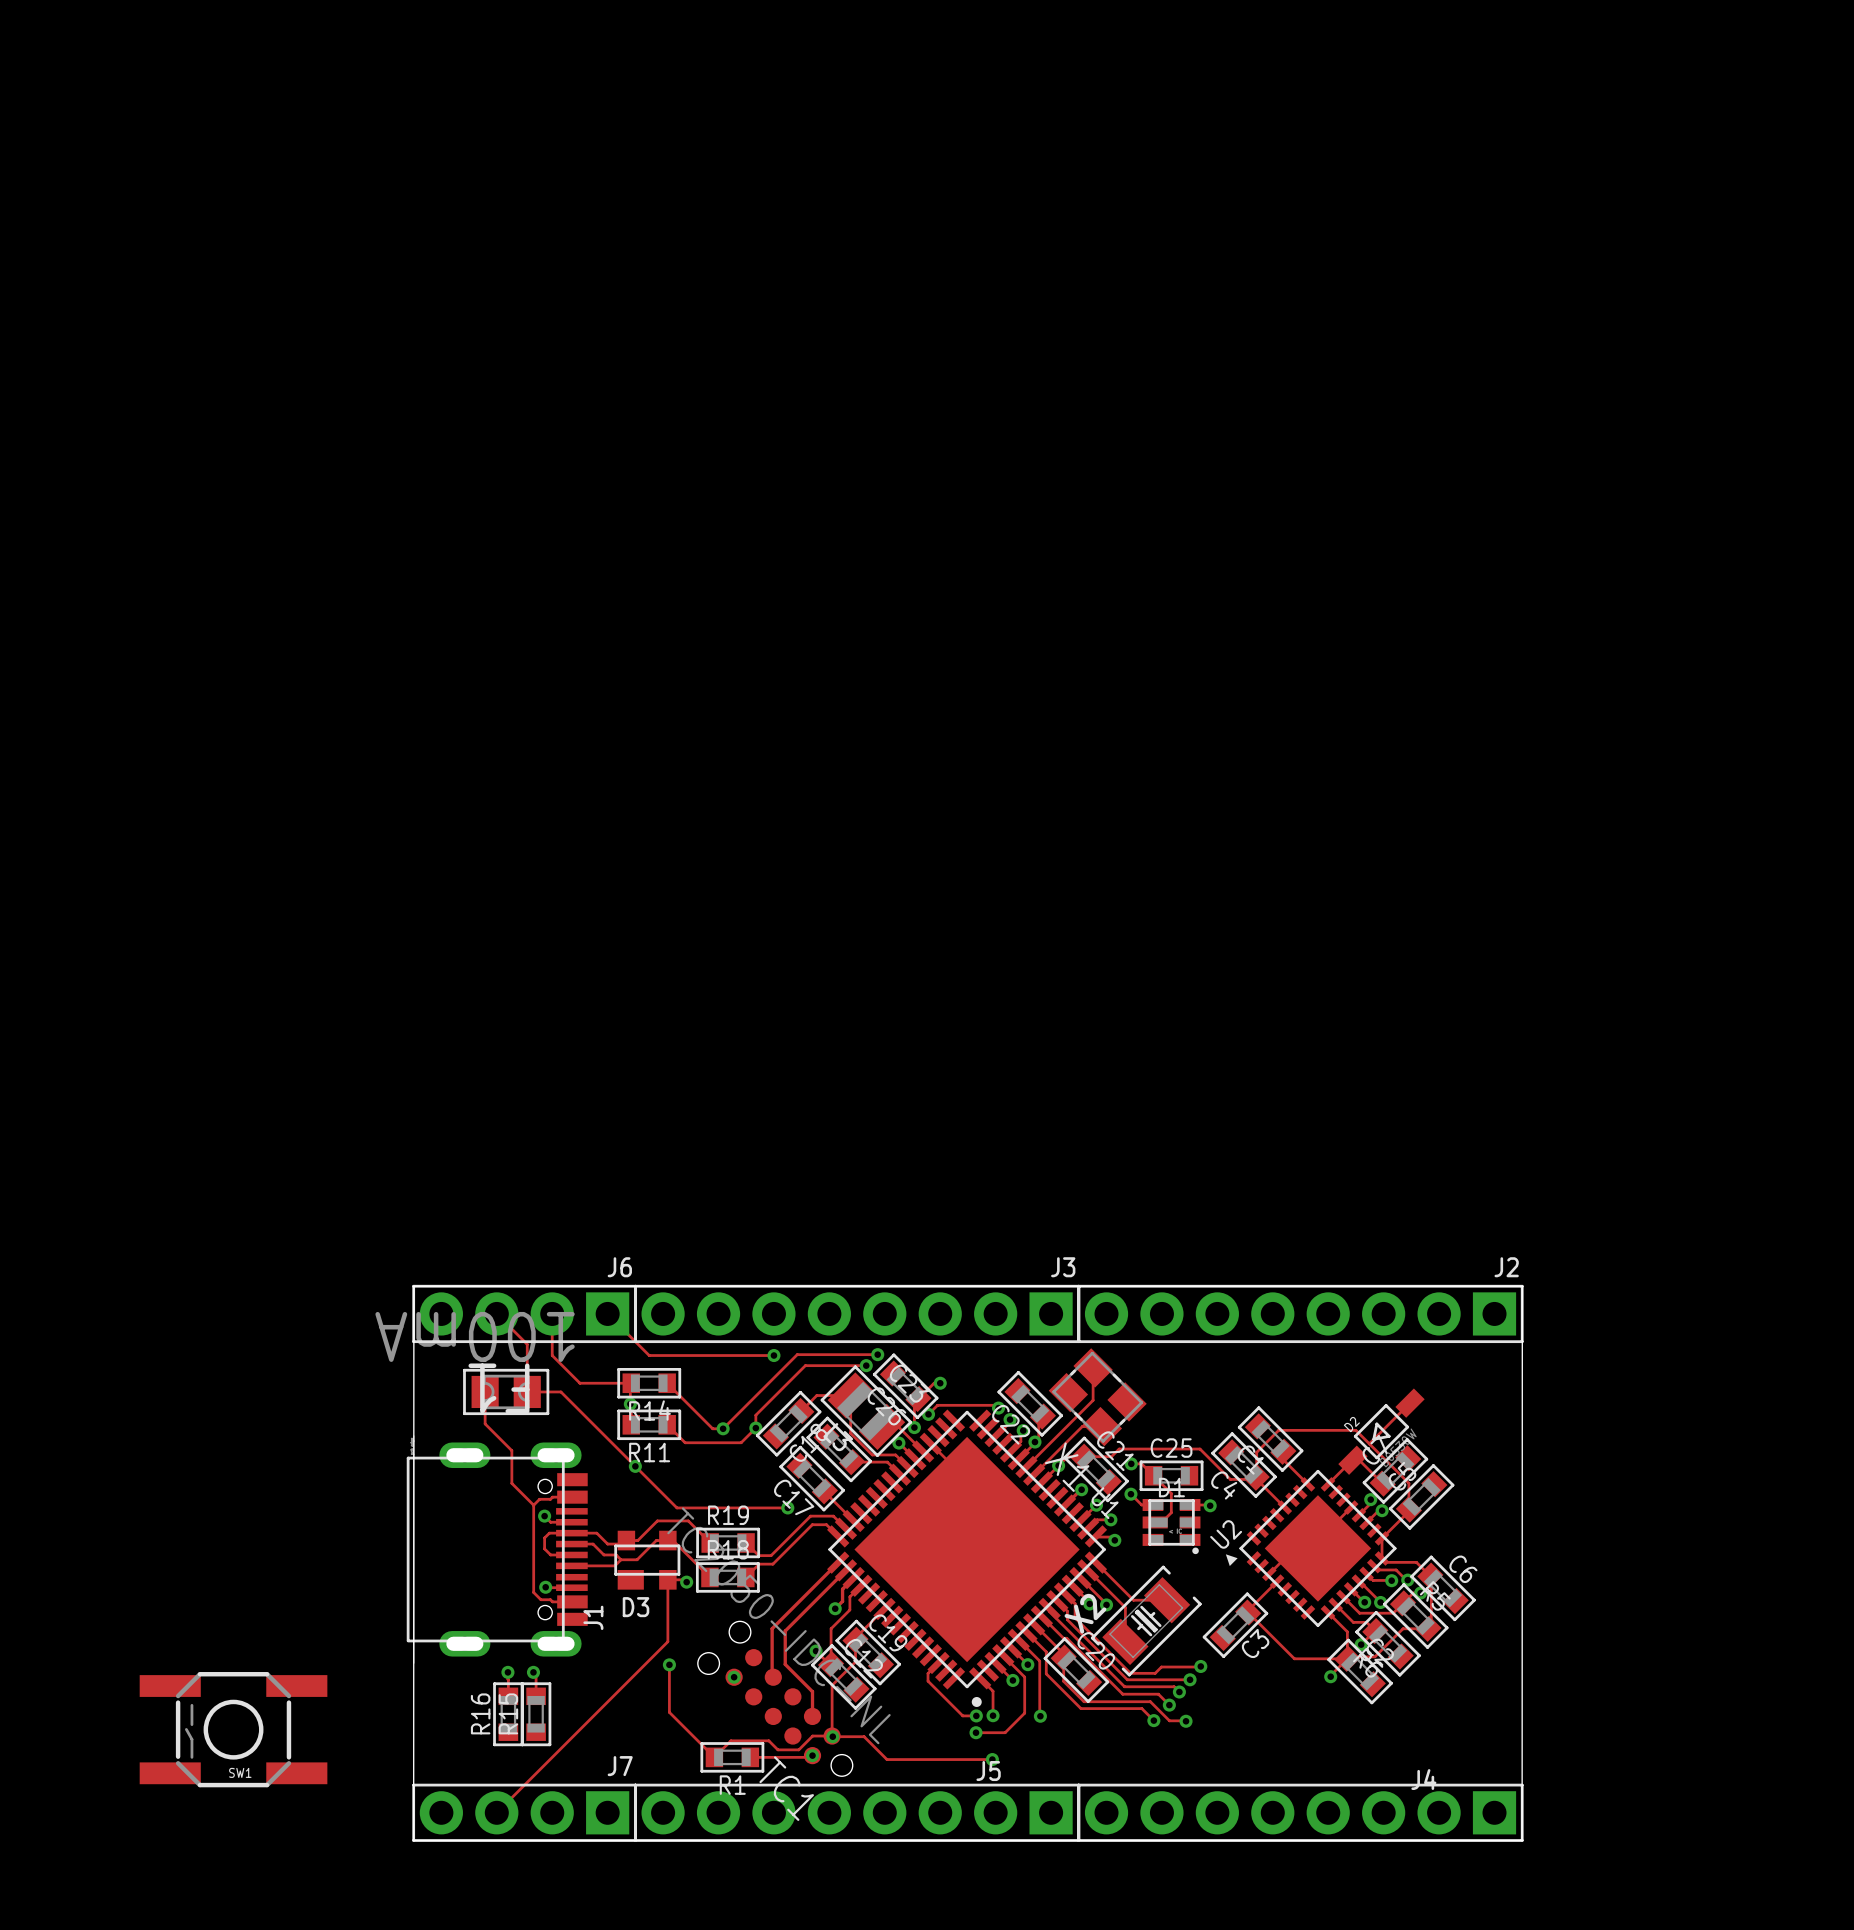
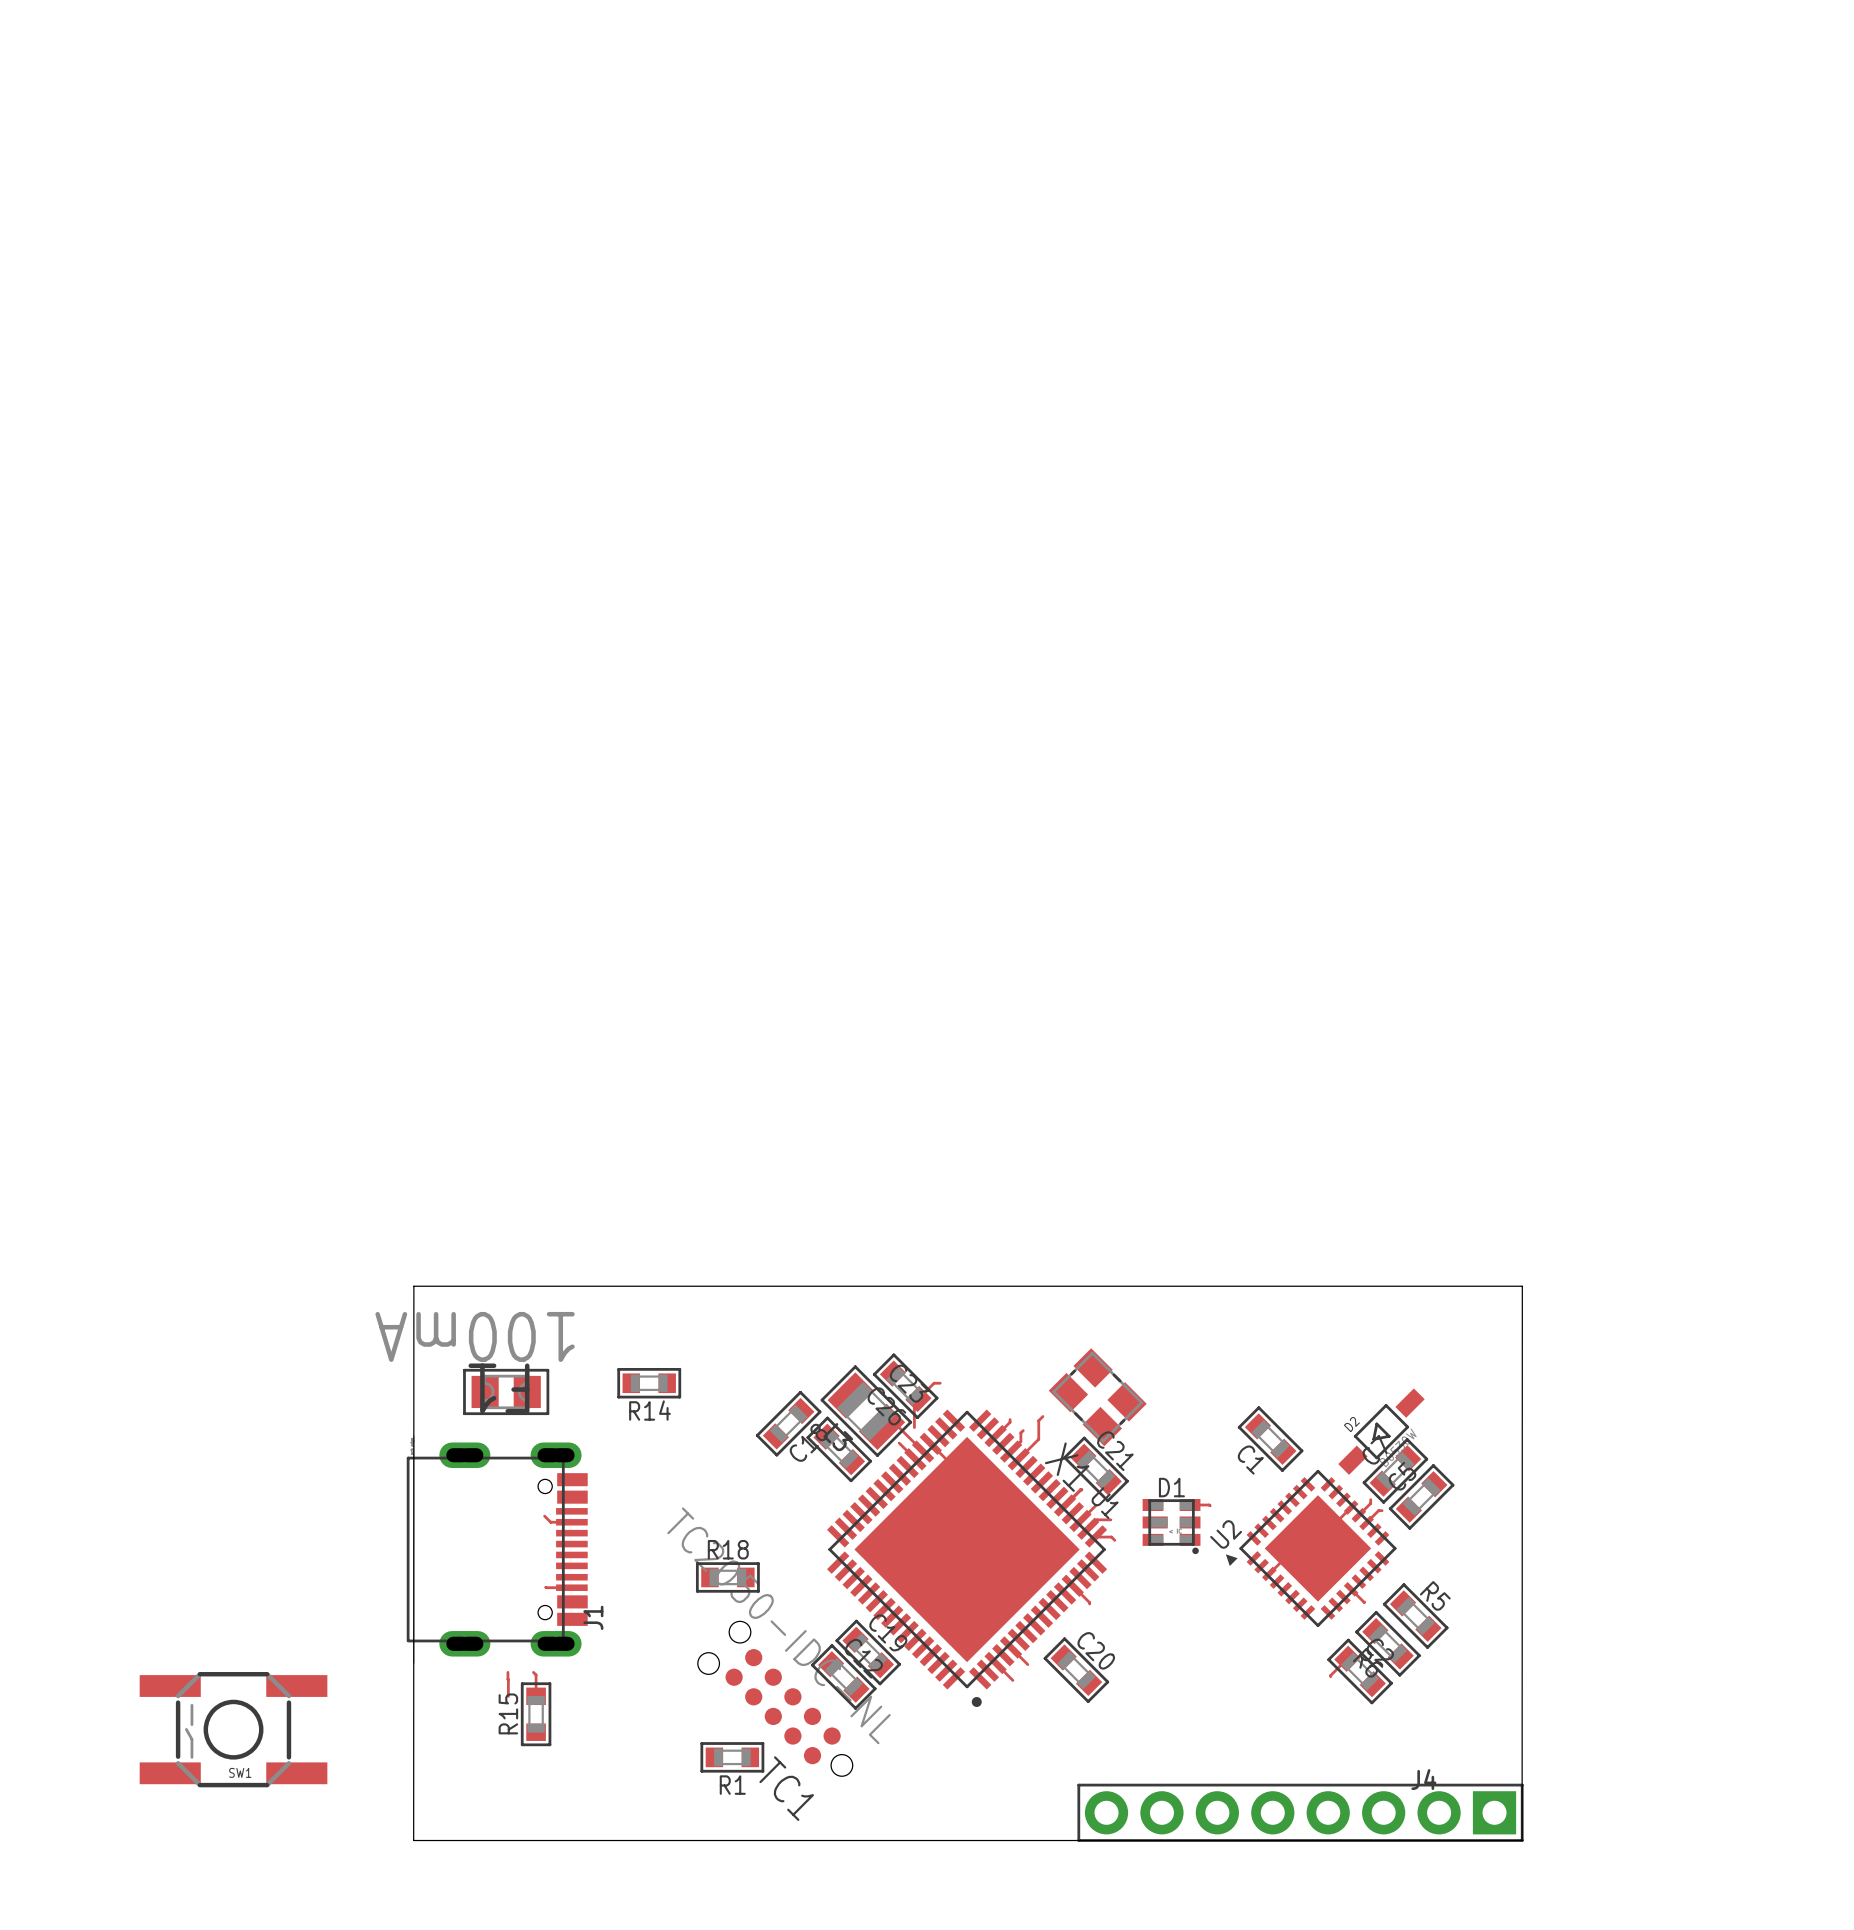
track: (496, 1313) (527, 1344) (527, 1391) (560, 1391) (676, 1507) (787, 1507) -> none
J6: (524, 1313) -> none
track: (552, 1313) (552, 1355) (579, 1383) (631, 1383) (631, 1424) -> none
track: (607, 1313) (649, 1355) (773, 1355) -> none
J3: (857, 1313) -> none
J2: (1300, 1313) -> none
track: (877, 1354) (797, 1354) (723, 1428) (712, 1428) (667, 1383) -> none
via: (877, 1354) -> none
via: (773, 1355) -> none
track: (866, 1365) (805, 1365) (755, 1415) (755, 1428) (741, 1442) (685, 1442) (667, 1424) -> none
via: (866, 1365) -> none
track: (1093, 1367) (1093, 1400) (1026, 1466) -> none
via: (940, 1383) -> none
track: (485, 1391) (485, 1423) (511, 1450) (511, 1483) (533, 1505) -> none
C22: (1030, 1403) -> none
track: (1410, 1403) (1369, 1443) -> none
via: (630, 1404) -> none
track: (998, 1408) (995, 1405) (937, 1405) (928, 1414) -> none
via: (998, 1408) -> none
track: (801, 1411) (816, 1395) (850, 1395) (850, 1433) (872, 1454) (895, 1454) (907, 1466) -> none
via: (928, 1414) -> none
via: (1010, 1419) -> none
R11: (649, 1424) -> none
track: (1102, 1426) (1082, 1426) (1034, 1474) -> none
via: (914, 1427) -> none
via: (723, 1428) -> none
via: (755, 1428) -> none
via: (1023, 1430) -> none
via: (1034, 1442) -> none
via: (898, 1443) -> none
track: (1283, 1451) (1283, 1459) (1307, 1484) -> none
track: (851, 1462) (887, 1462) (899, 1474) -> none
track: (1131, 1463) (1141, 1463) (1171, 1493) (1171, 1512) (1161, 1522) (1155, 1522) -> none
via: (1131, 1463) -> none
via: (1058, 1465) -> none
C4: (1243, 1465) -> none
via: (635, 1466) -> none
C25: (1171, 1475) -> none
C17: (812, 1478) -> none
track: (1256, 1479) (1284, 1507) -> none
track: (1256, 1479) (1256, 1452) (1278, 1430) (1355, 1430) (1408, 1483) (1408, 1511) (1382, 1538) (1382, 1558) (1385, 1562) (1416, 1562) (1430, 1575) (1431, 1625) (1428, 1628) (1403, 1628) (1374, 1656) (1347, 1656) -> none
track: (1256, 1479) (1230, 1479) (1200, 1449) (1119, 1449) (1111, 1456) (1067, 1456) (1041, 1482) -> none
track: (1382, 1483) (1359, 1460) (1352, 1460) (1328, 1484) -> none
via: (1081, 1489) -> none
track: (824, 1491) (853, 1520) -> none
track: (1130, 1494) (1141, 1505) (1152, 1505) -> none
via: (1130, 1494) -> none
track: (572, 1497) (539, 1499) (533, 1505) -> none
via: (1370, 1499) -> none
track: (533, 1505) (533, 1592) (540, 1599) (572, 1601) -> none
via: (1096, 1505) -> none
via: (1210, 1505) -> none
via: (787, 1507) -> none
via: (1382, 1510) -> none
via: (544, 1516) -> none
via: (1110, 1519) -> none
track: (845, 1528) (833, 1516) (810, 1516) (771, 1555) (758, 1555) (746, 1542) -> none
track: (838, 1536) (826, 1524) (812, 1524) (772, 1564) (759, 1564) (745, 1577) -> none
via: (1114, 1540) -> none
track: (710, 1542) (688, 1520) (657, 1520) (637, 1540) (626, 1540) (629, 1544) (607, 1544) (596, 1533) (549, 1533) (544, 1537) (544, 1548) (550, 1554) (571, 1554) -> none
R19: (728, 1542) -> none
track: (571, 1544) (593, 1544) (603, 1554) (616, 1554) (620, 1559) -> none
track: (620, 1559) (637, 1559) (656, 1540) (673, 1540) (709, 1577) -> none
track: (620, 1559) (614, 1565) (571, 1565) -> none
D3: (647, 1560) -> none
track: (838, 1562) (772, 1628) (773, 1677) -> none
track: (1095, 1562) (1133, 1600) (1167, 1600) -> none
track: (1374, 1566) (1378, 1569) (1396, 1569) (1407, 1580) -> none
track: (845, 1570) (785, 1631) (785, 1664) (812, 1691) (812, 1716) -> none
track: (1088, 1570) (1125, 1607) (1125, 1641) -> none
track: (1366, 1573) (1373, 1580) (1391, 1580) -> none
track: (853, 1578) (842, 1589) (842, 1601) (835, 1608) -> none
track: (1080, 1578) (1106, 1604) -> none
via: (1391, 1580) -> none
via: (1407, 1580) -> none
track: (1277, 1581) (1248, 1612) (1294, 1658) (1347, 1658) (1347, 1631) (1328, 1612) -> none
track: (1358, 1581) (1380, 1602) -> none
track: (686, 1582) (684, 1579) (667, 1579) (667, 1641) (496, 1812) -> none
via: (686, 1582) -> none
track: (860, 1585) (849, 1596) (849, 1609) (831, 1628) (831, 1664) (816, 1651) -> none
via: (545, 1587) -> none
C6: (1443, 1588) -> none
track: (1065, 1593) (1075, 1603) (1075, 1617) (1130, 1673) (1155, 1673) (1161, 1667) (1200, 1666) -> none
track: (1420, 1593) (1413, 1593) (1393, 1613) (1359, 1613) (1343, 1597) -> none
via: (1420, 1593) -> none
track: (1057, 1601) (1067, 1611) (1067, 1619) (1127, 1679) (1190, 1679) -> none
via: (1364, 1602) -> none
via: (1380, 1602) -> none
via: (1089, 1603) -> none
via: (1106, 1604) -> none
track: (1335, 1604) (1353, 1622) (1366, 1622) (1375, 1631) (1361, 1644) -> none
via: (835, 1608) -> none
track: (884, 1608) (855, 1637) (855, 1661) (832, 1685) (832, 1736) (812, 1736) (798, 1749) (777, 1749) (768, 1740) (730, 1740) (714, 1757) (669, 1712) (669, 1664) -> none
track: (1049, 1608) (1049, 1611) (1124, 1686) (1174, 1686) (1179, 1692) -> none
track: (1041, 1616) (1063, 1638) (1066, 1638) (1122, 1694) (1158, 1694) (1169, 1705) -> none
X2: (1146, 1621) -> none
track: (1034, 1624) (1063, 1653) (1063, 1681) (1084, 1701) (1150, 1701) (1169, 1720) (1186, 1721) -> none
C3: (1235, 1625) -> none
track: (1026, 1632) (1046, 1651) (1046, 1673) (1080, 1708) (1141, 1708) (1153, 1720) -> none
track: (1018, 1640) (1039, 1661) (1040, 1716) -> none
via: (1361, 1644) -> none
via: (816, 1651) -> none
track: (1003, 1655) (1024, 1677) (1024, 1713) (1005, 1732) (976, 1732) -> none
track: (938, 1662) (928, 1673) (928, 1681) (962, 1715) (976, 1715) -> none
via: (669, 1664) -> none
via: (1027, 1664) -> none
via: (1200, 1666) -> none
via: (507, 1672) -> none
via: (533, 1672) -> none
via: (1330, 1676) -> none
via: (734, 1677) -> none
track: (980, 1678) (993, 1691) (993, 1715) -> none
via: (1190, 1679) -> none
via: (1012, 1680) -> none
via: (1179, 1692) -> none
via: (1169, 1705) -> none
R16: (508, 1714) -> none
via: (976, 1715) -> none
via: (993, 1715) -> none
via: (1040, 1716) -> none
via: (1153, 1720) -> none
via: (1186, 1721) -> none
via: (976, 1732) -> none
track: (832, 1736) (864, 1736) (886, 1759) (992, 1759) -> none
via: (832, 1736) -> none
track: (812, 1755) (810, 1757) (750, 1757) -> none
via: (812, 1755) -> none
via: (992, 1759) -> none
J7: (524, 1812) -> none
J5: (857, 1812) -> none

